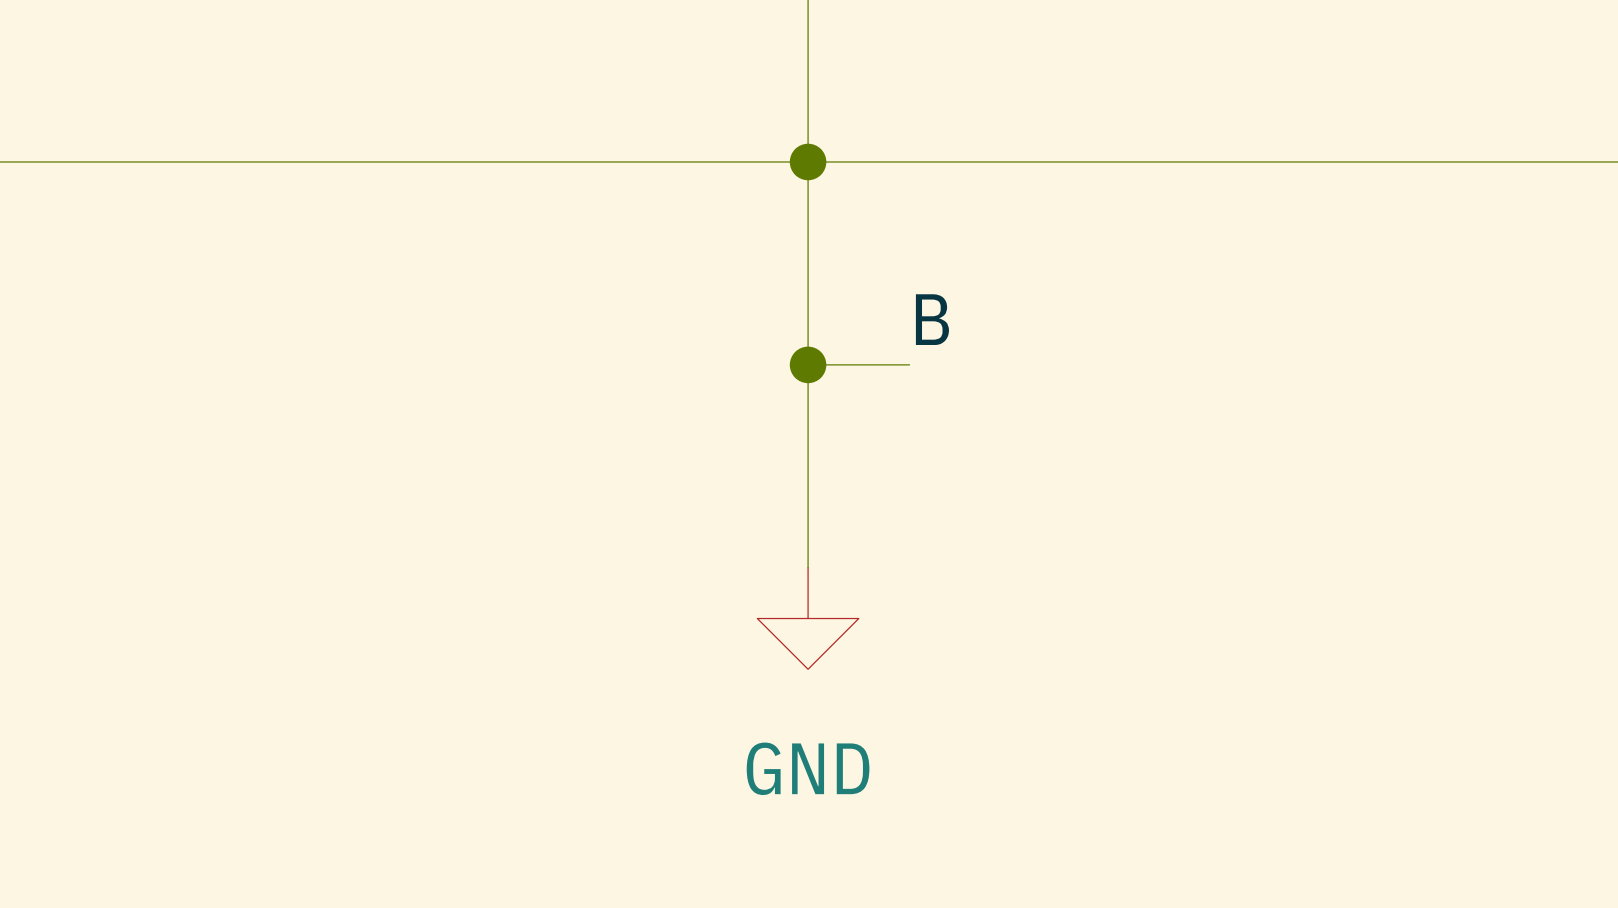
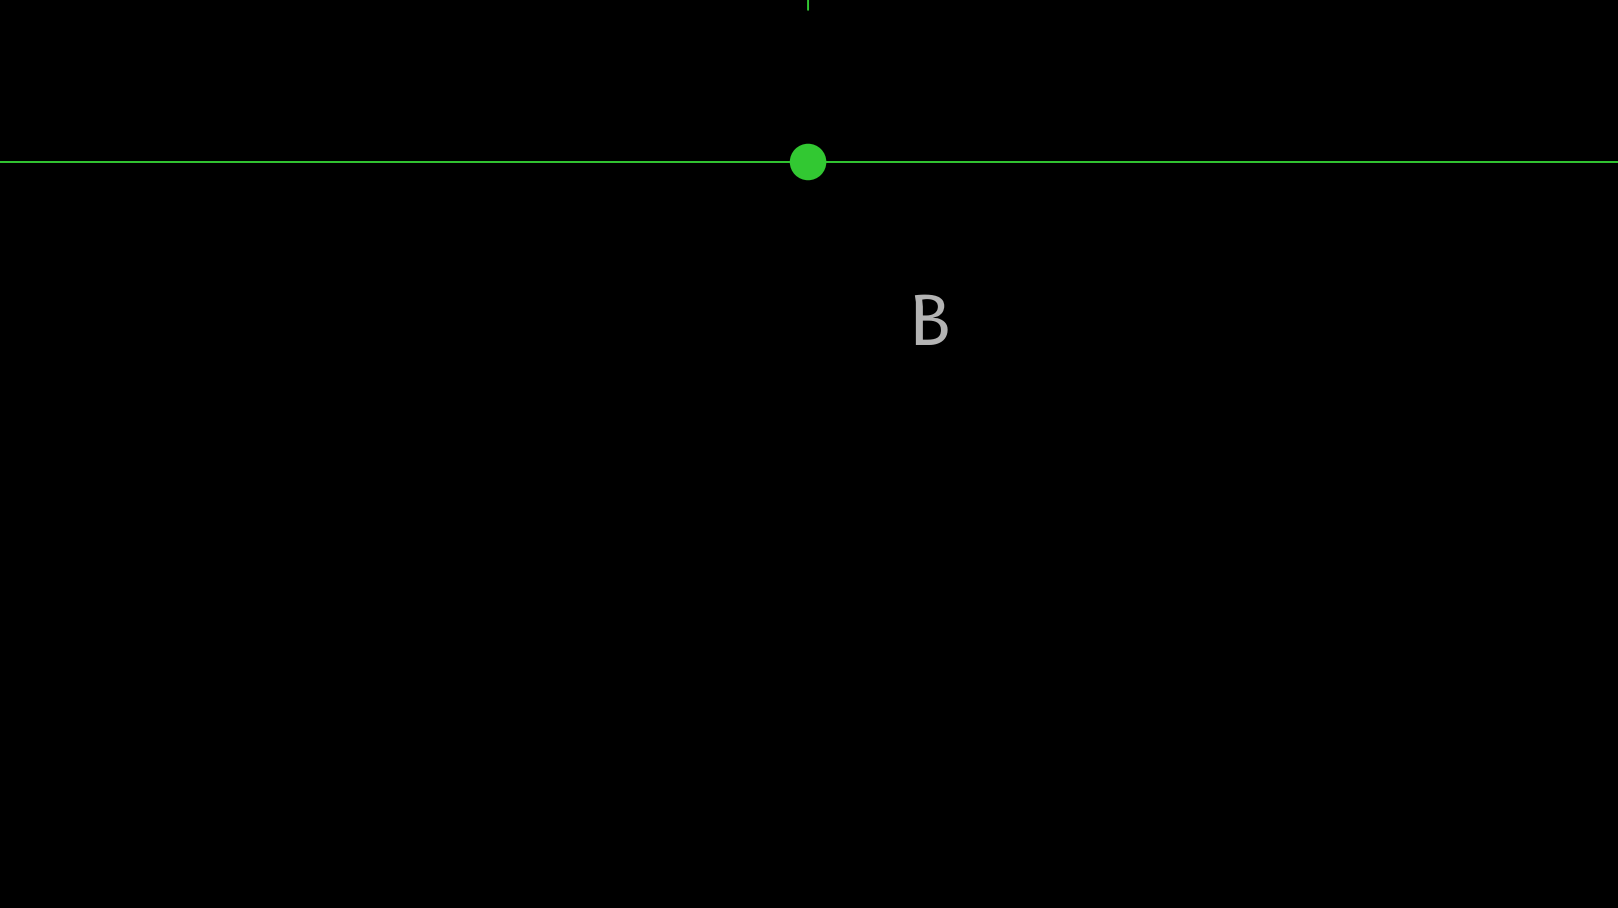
wire: (808, 9) (808, 567) -> none
wire: (808, 364) (909, 364) -> none
junction: (808, 364) -> none
power symbol: GND (808, 618) -> none

